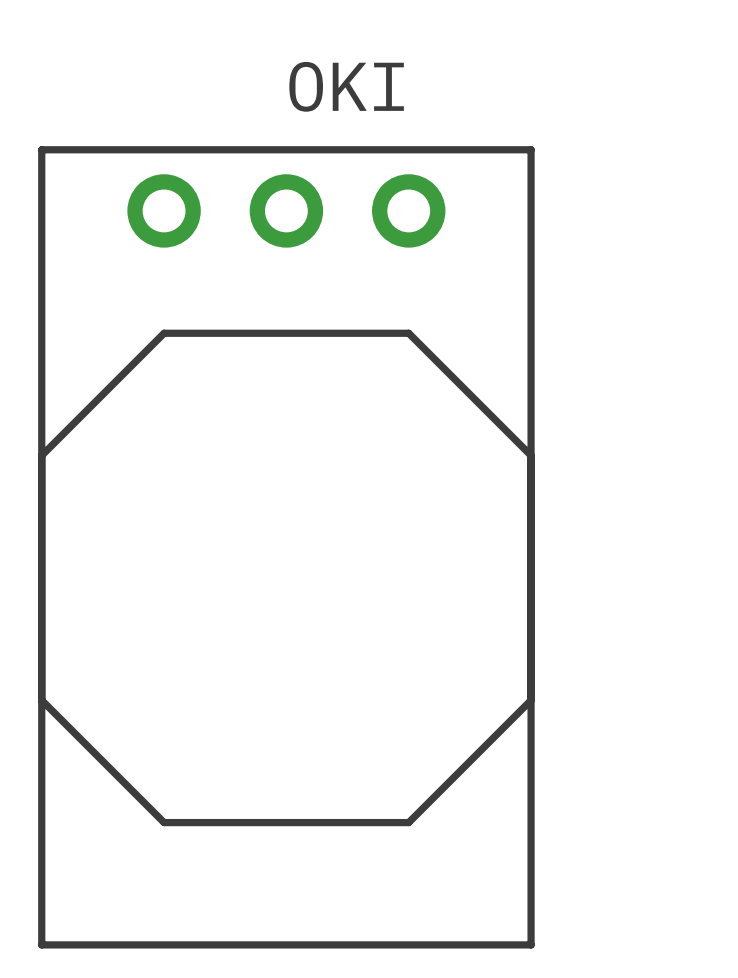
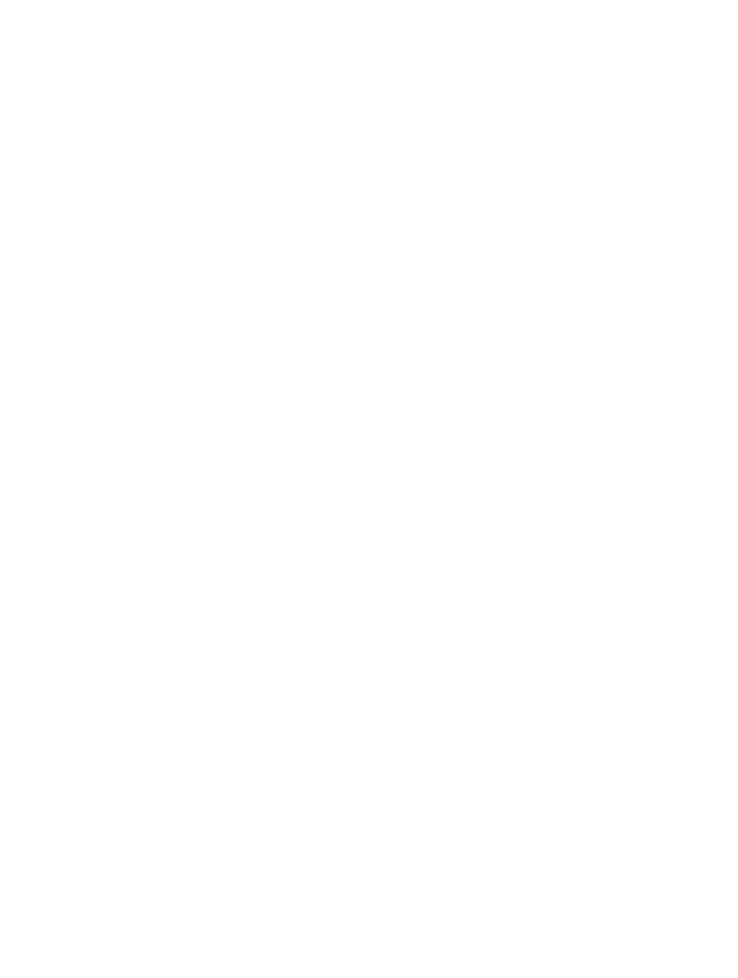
part: OKI (286, 547) -> none

